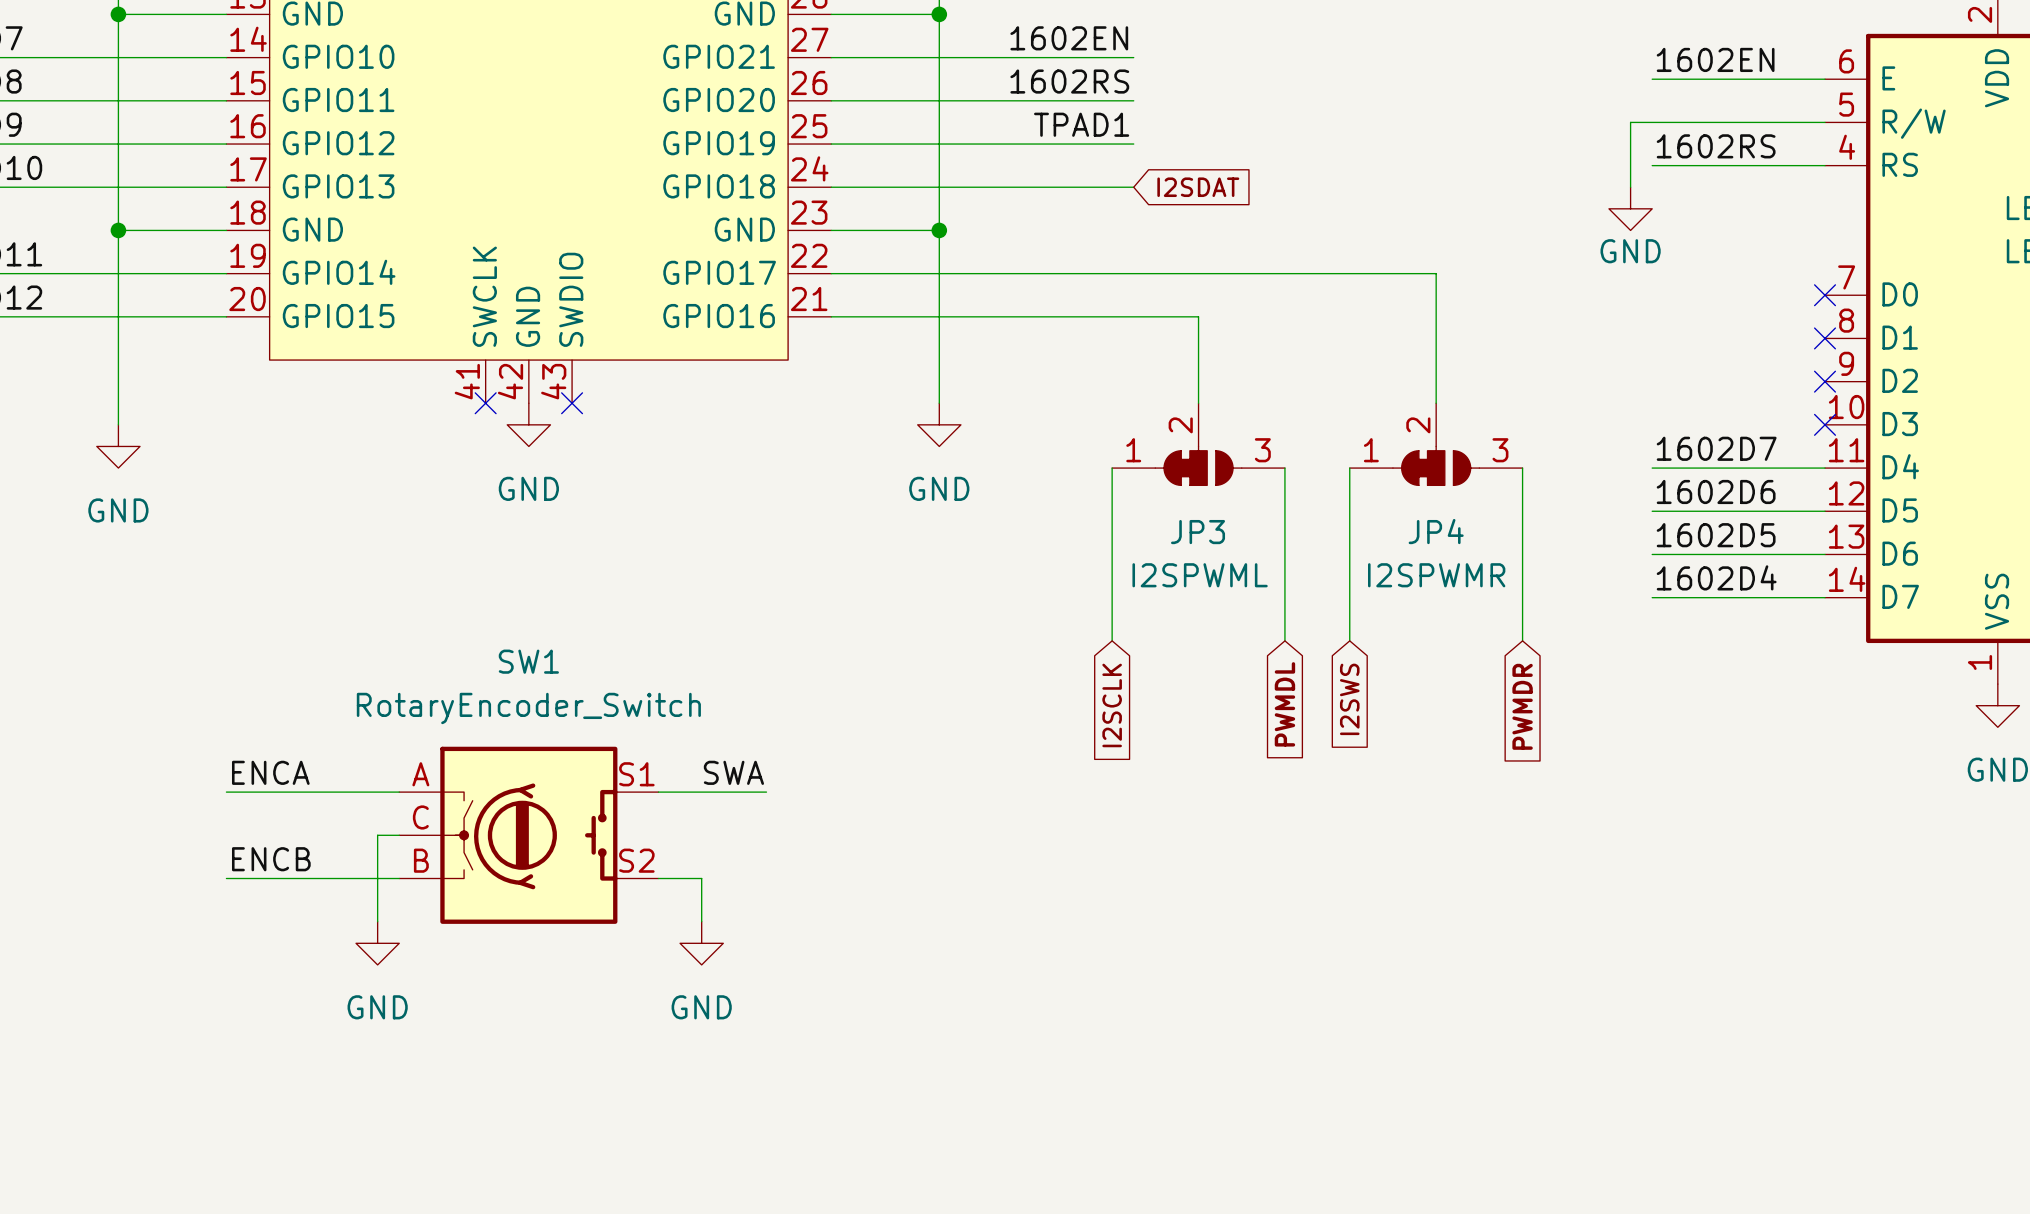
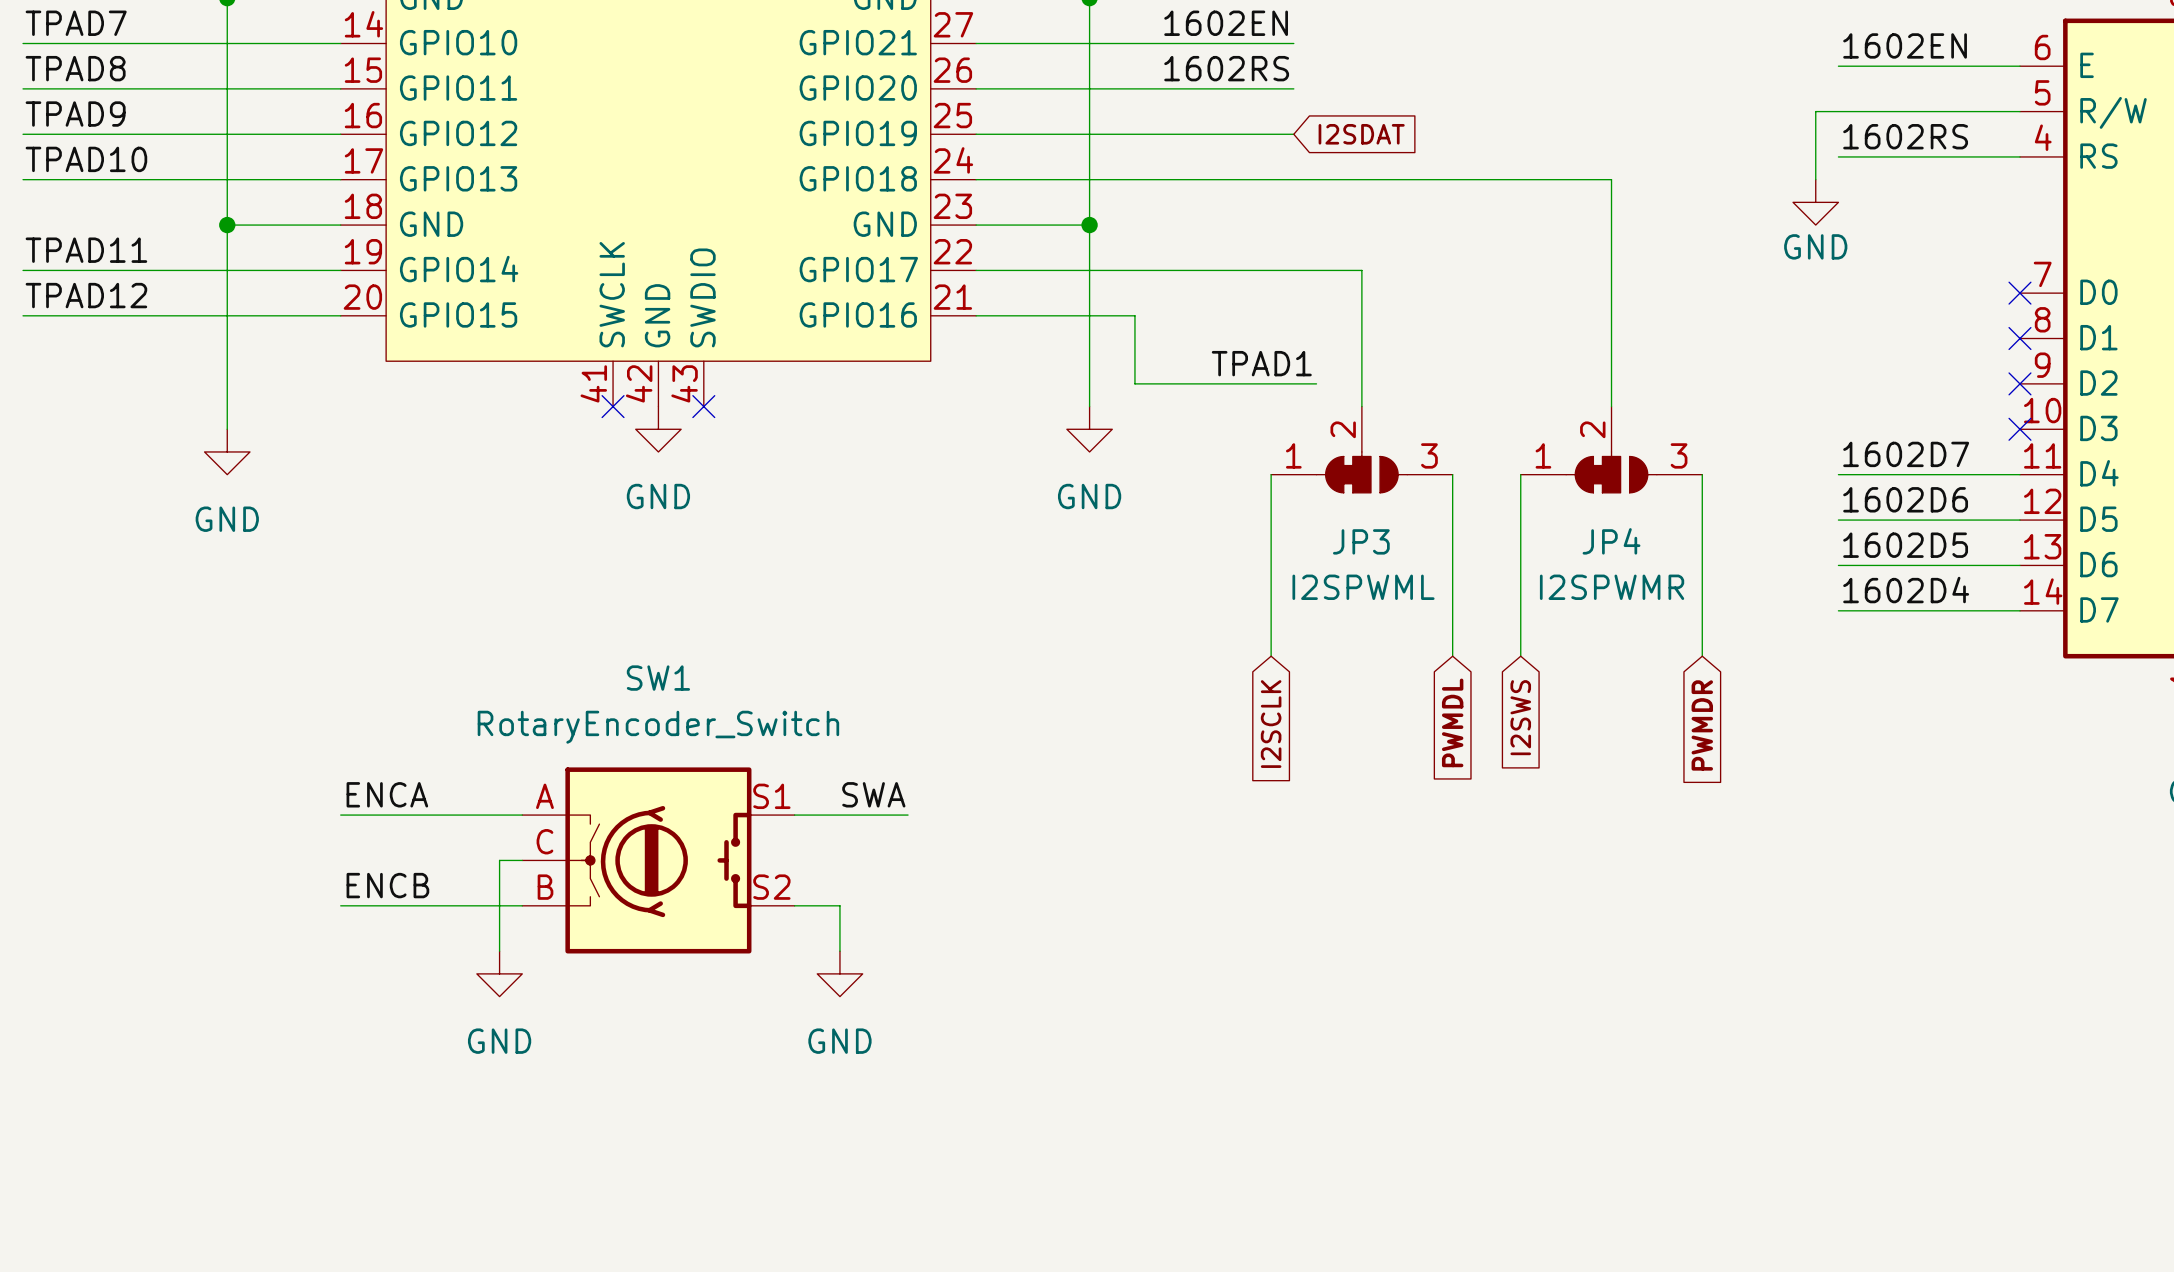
label position: TPAD1 (1081, 124) -> TPAD1 (1261, 363)
global label position: I2SDAT (1198, 187) -> I2SDAT (1361, 134)
wire: (1198, 273) (1436, 273) -> (1293, 179) (1611, 179) (1611, 270)
wire: none -> (1361, 270) (1361, 315)
wire: (982, 316) (1198, 316) -> (1134, 315) (1134, 383) (1316, 383)

